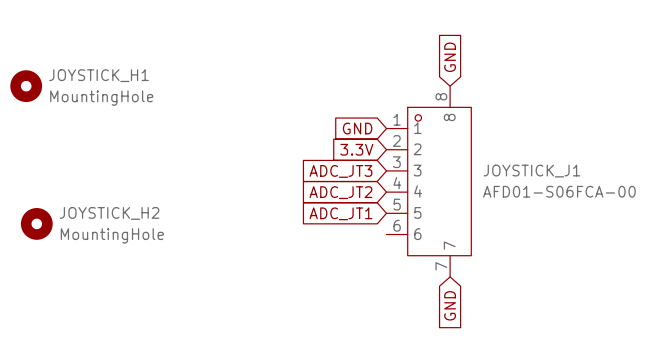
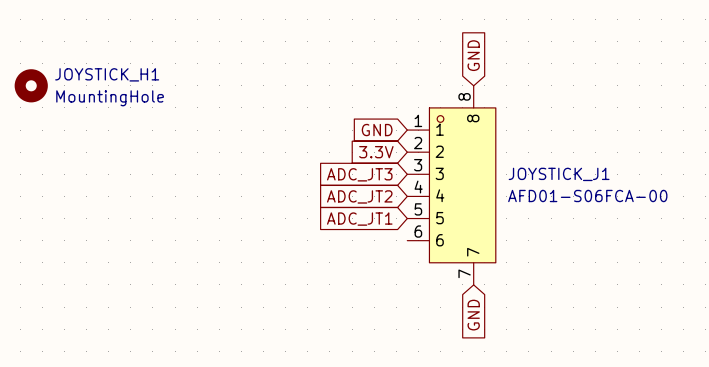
JOYSTICK_H2: MountingHole (36, 223) -> none

